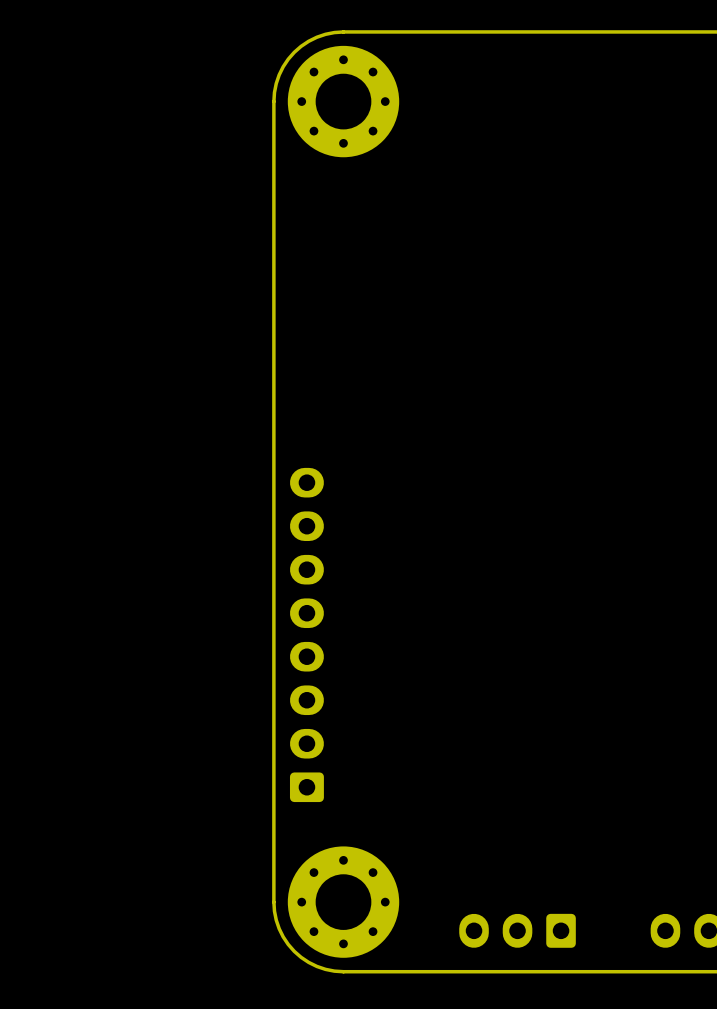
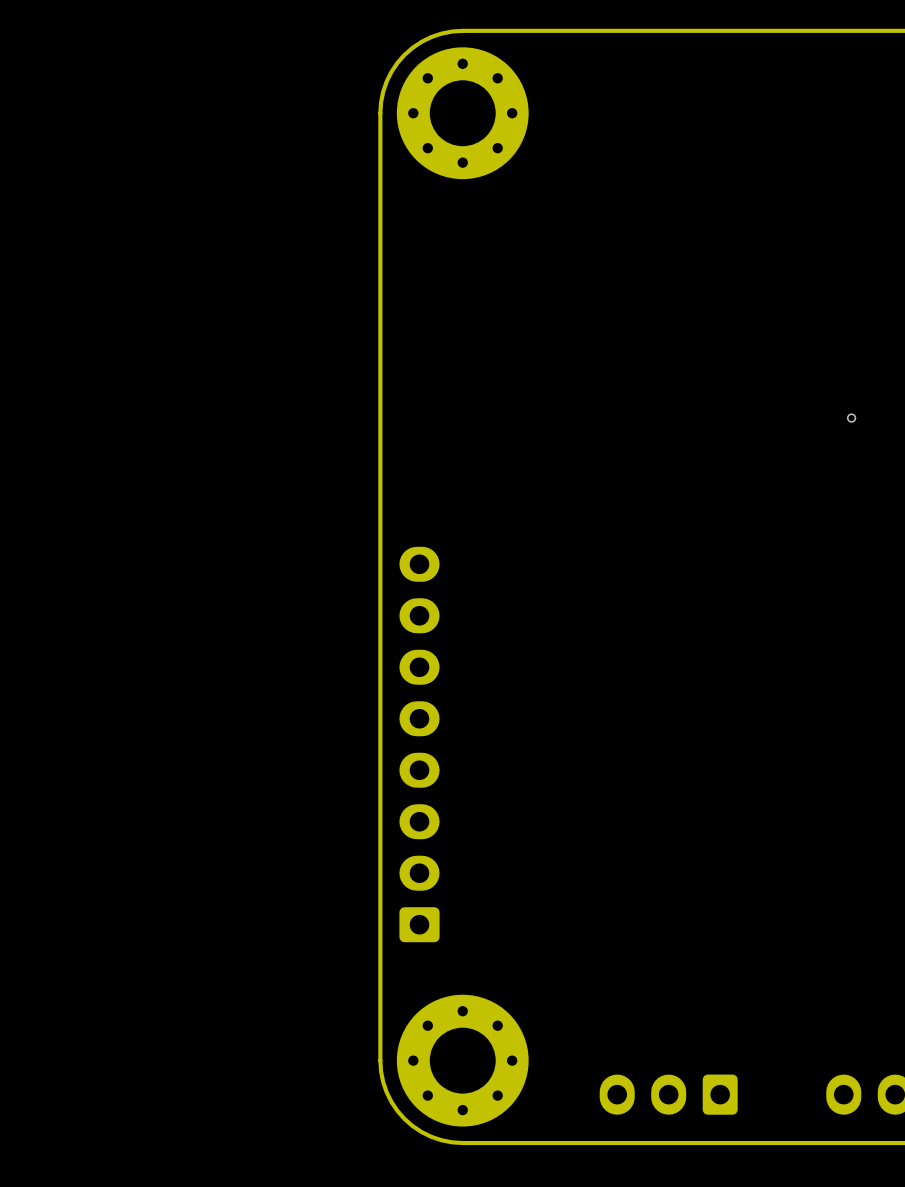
via: none -> (851, 418)

